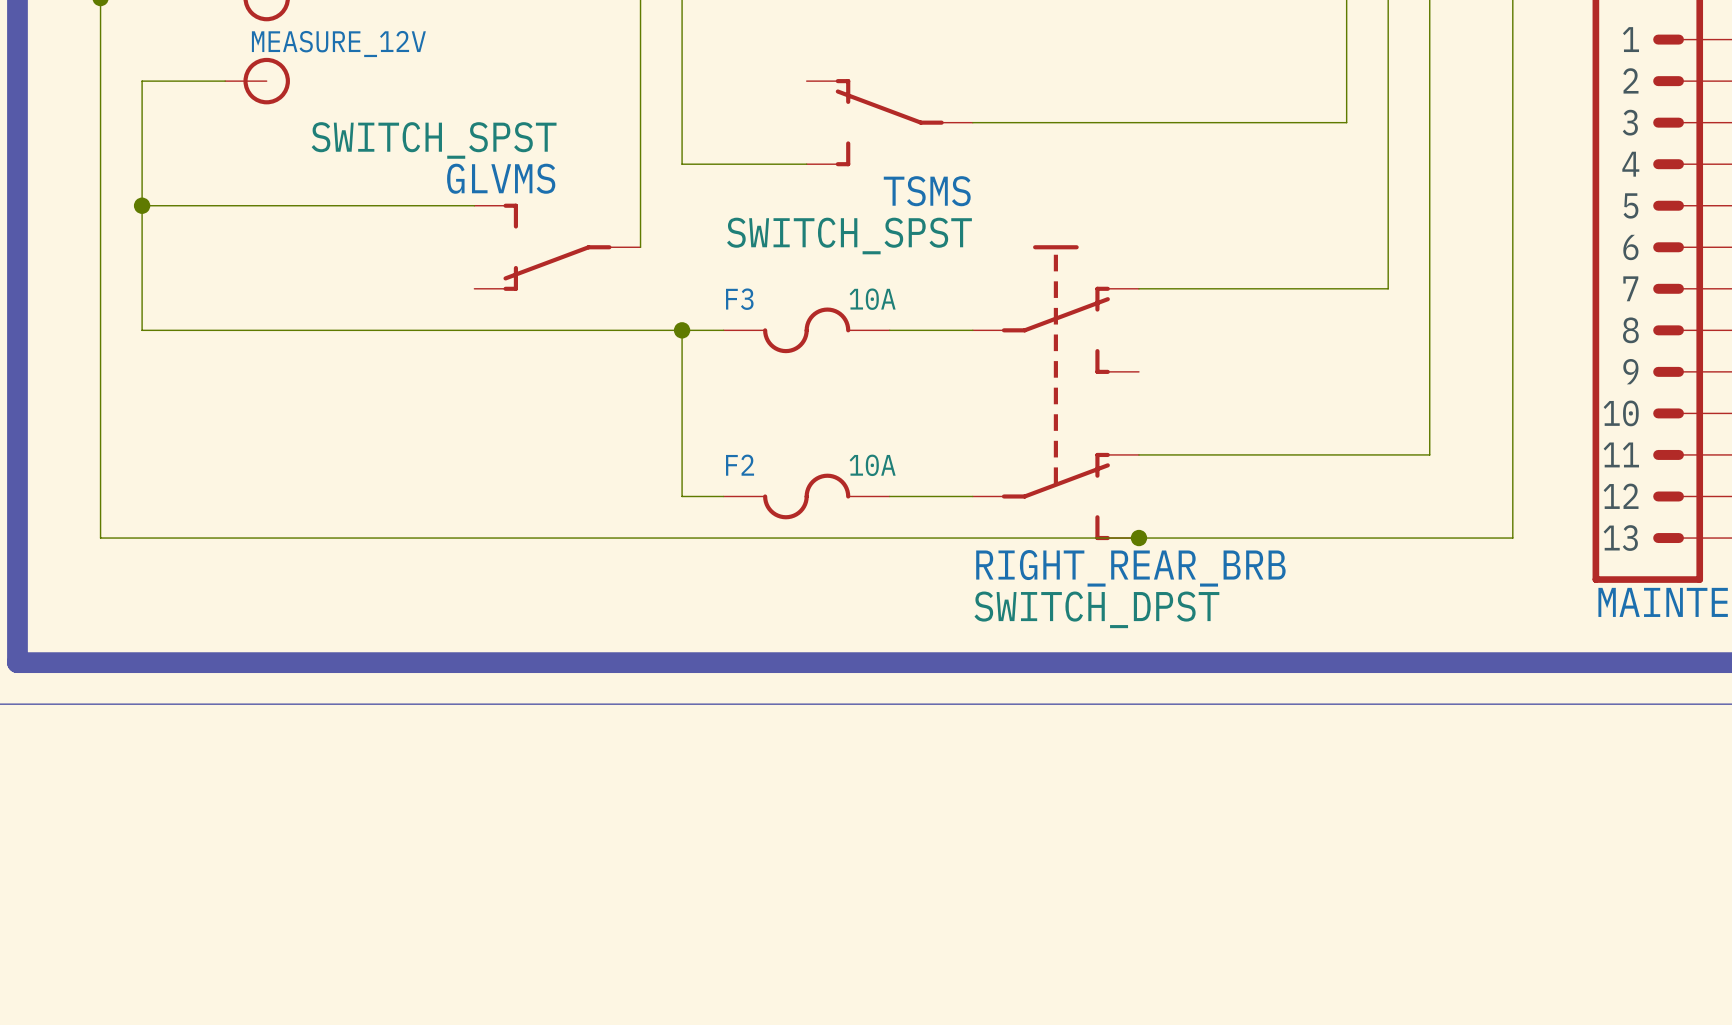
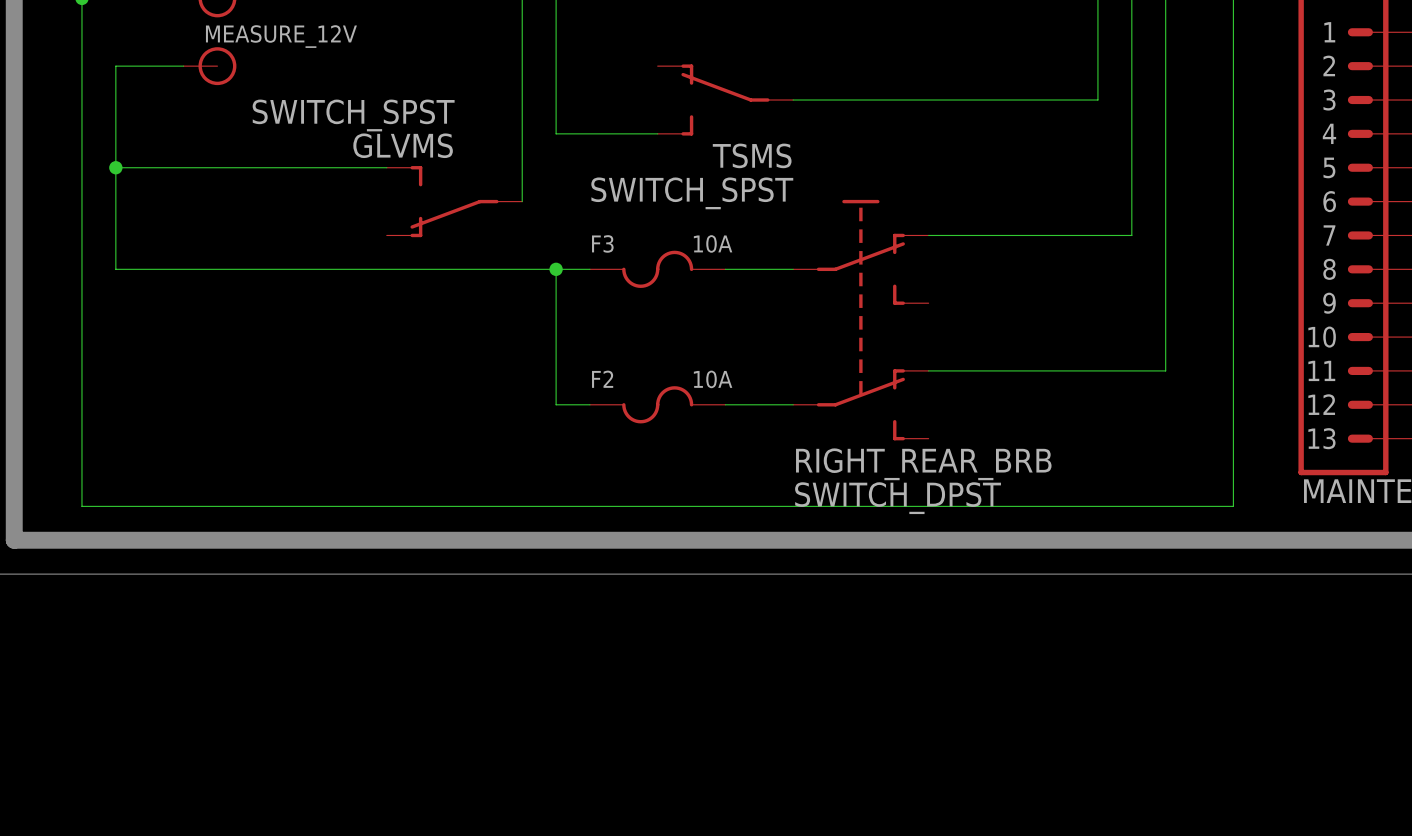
wire: (100, 538) (1512, 538) -> (81, 438) (81, 506) (1233, 506) (1233, 438)
junction: (1138, 538) -> none

